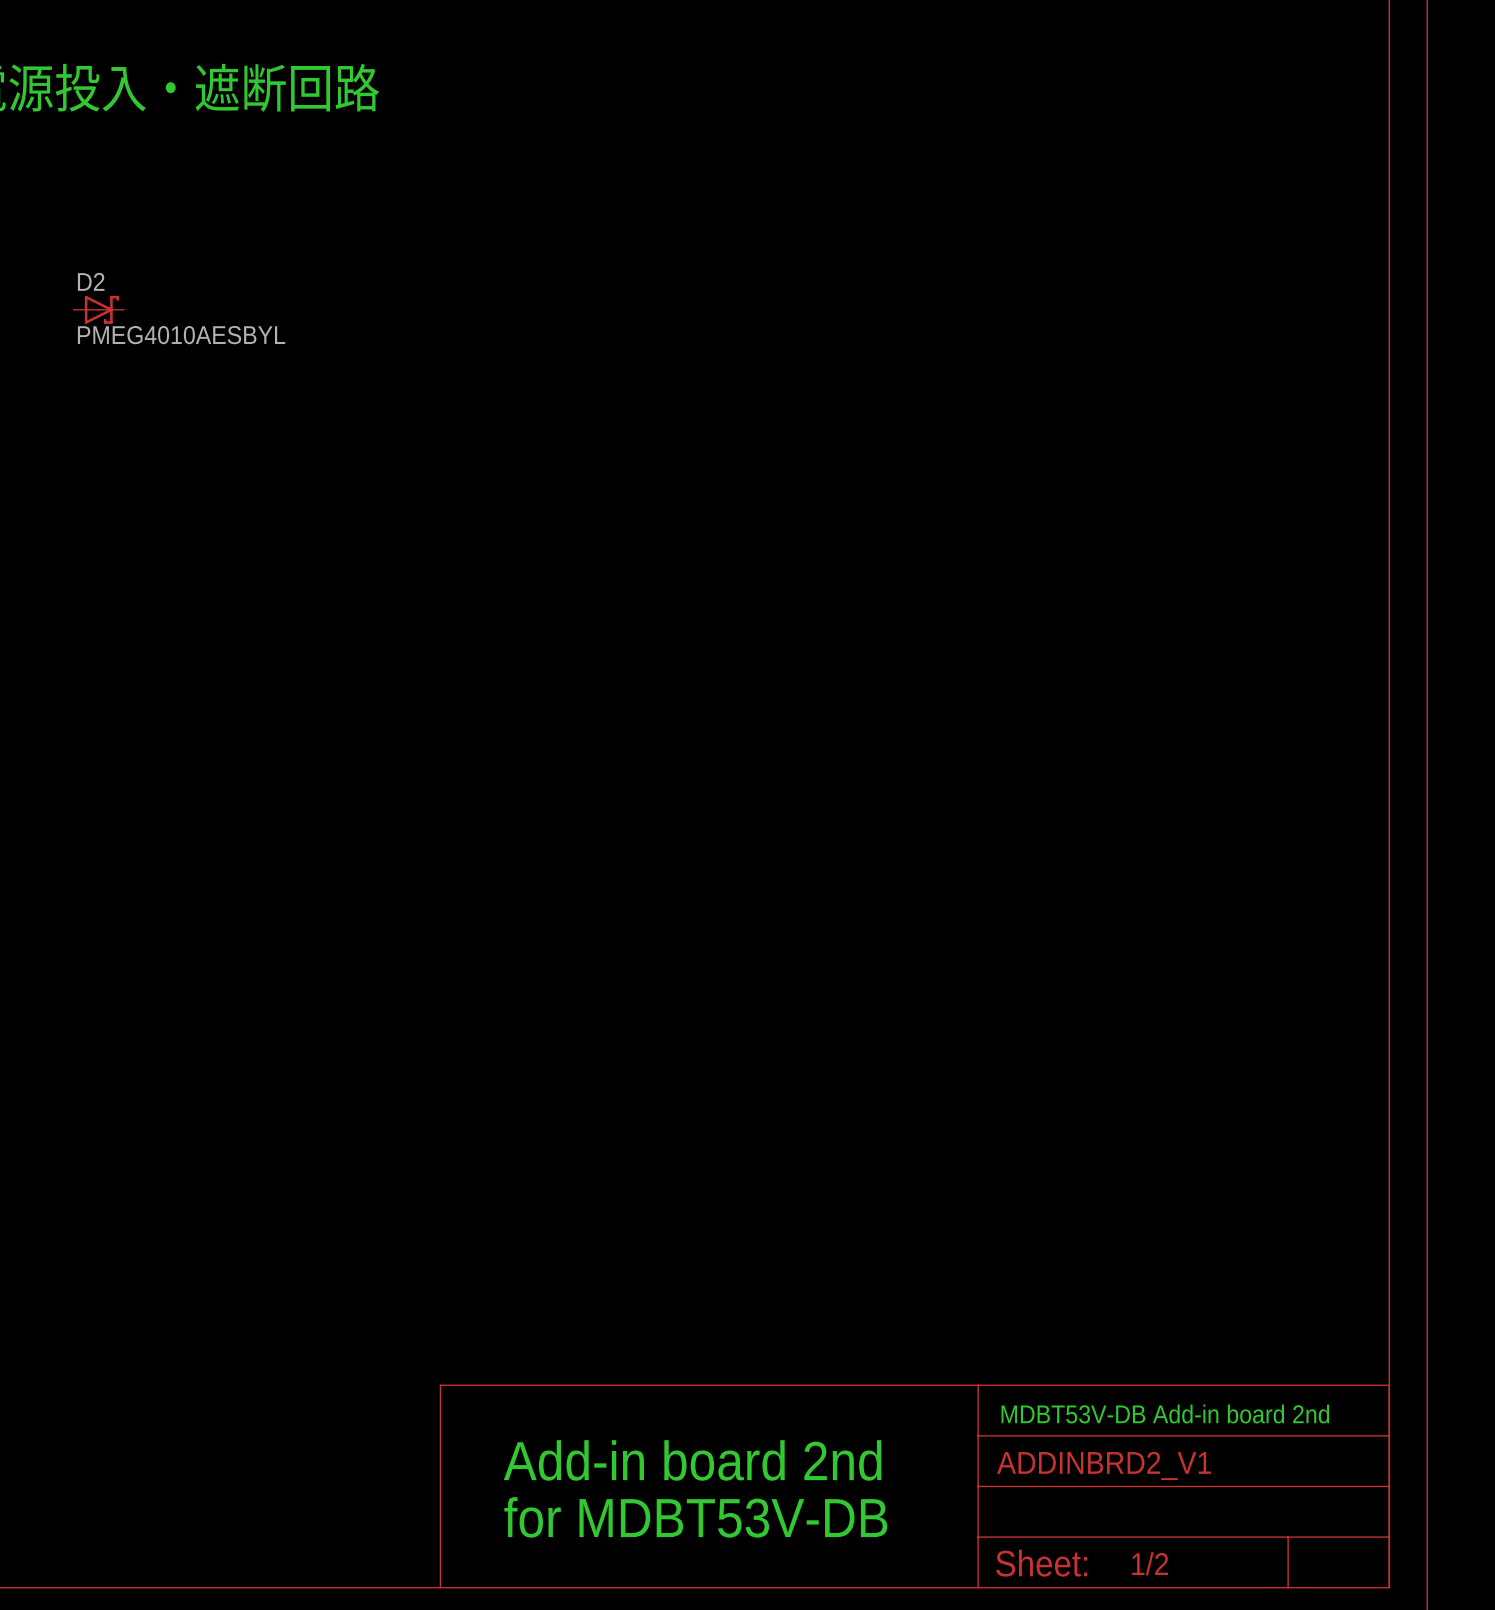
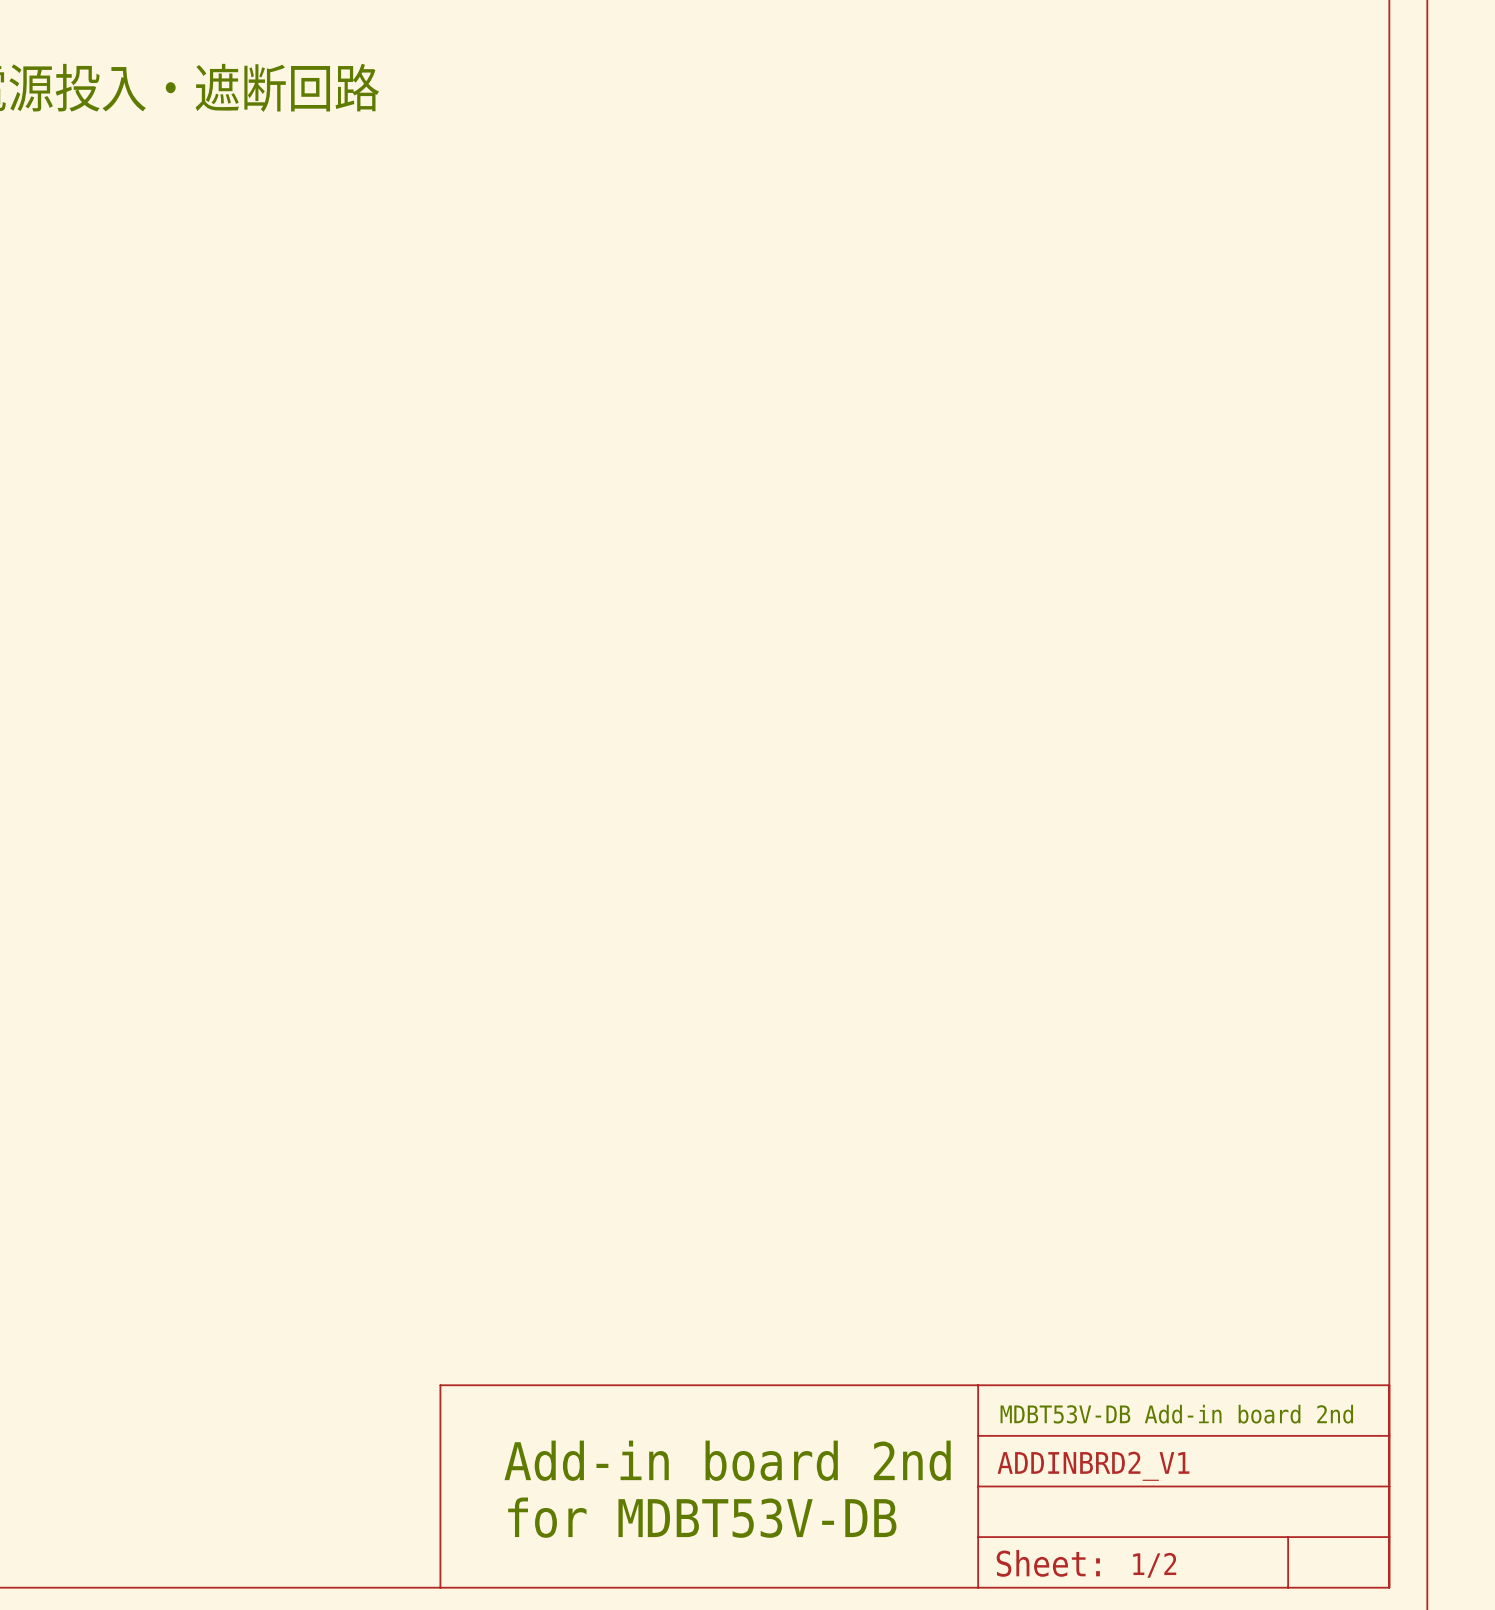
D2: PMEG4010AESBYL (98, 309) -> none

